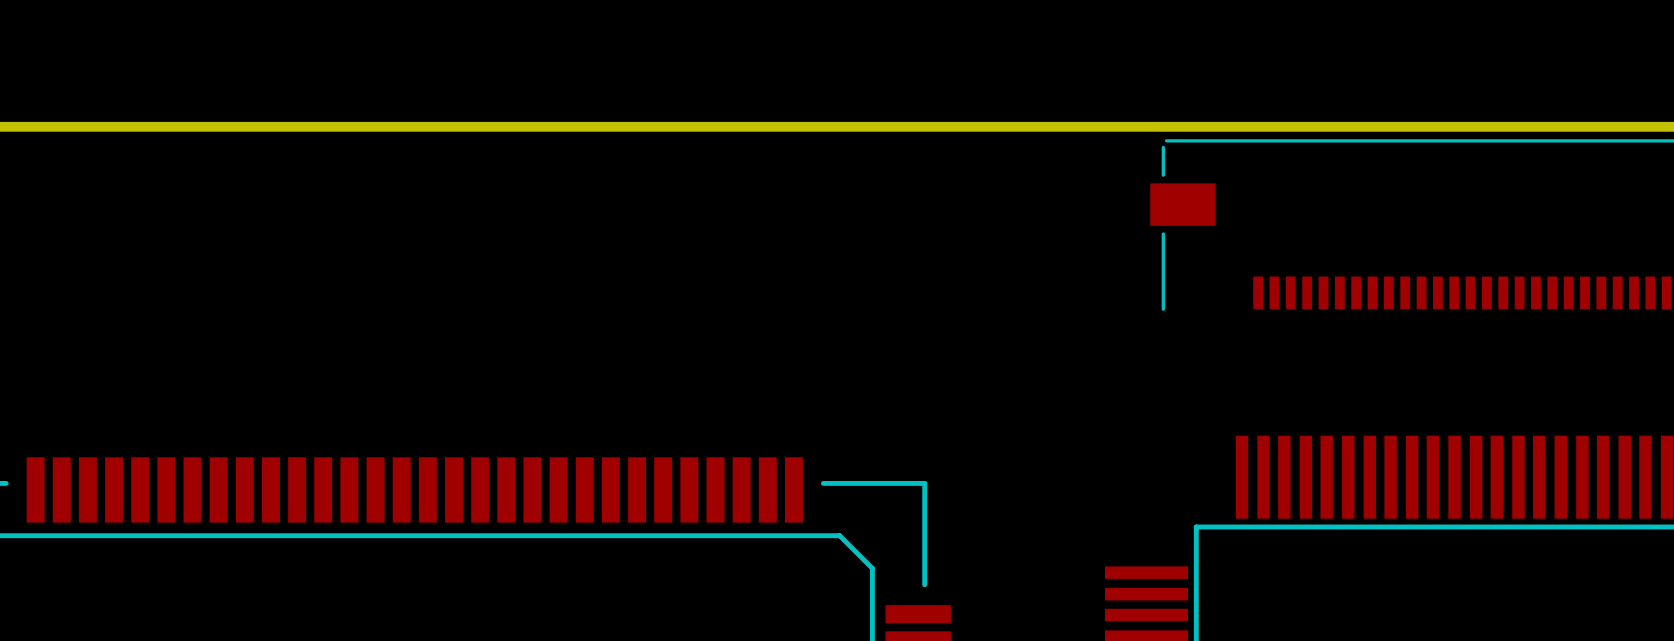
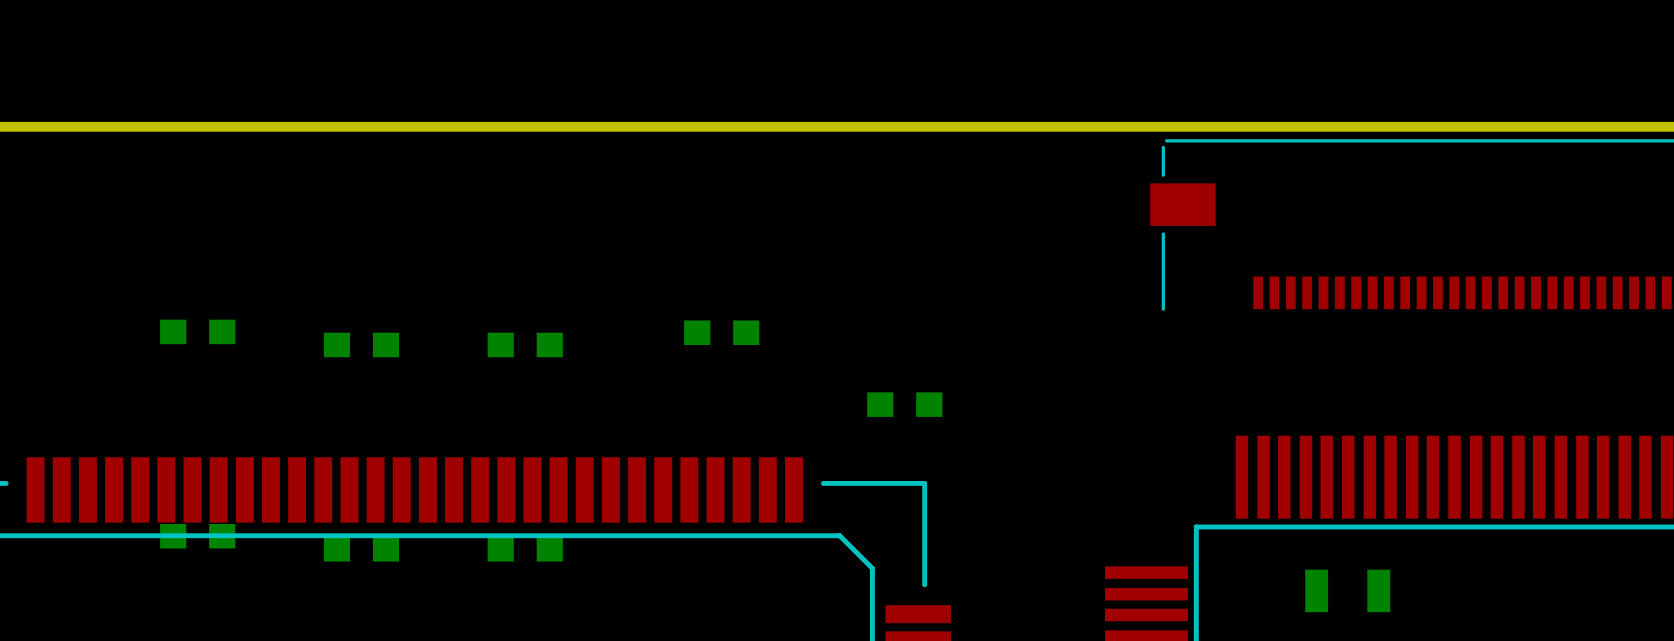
part: none -> (197, 331)
part: none -> (721, 332)
part: none -> (361, 344)
part: none -> (525, 344)
part: none -> (904, 404)
part: none -> (197, 536)
part: none -> (361, 549)
part: none -> (525, 549)
part: none -> (1347, 590)

